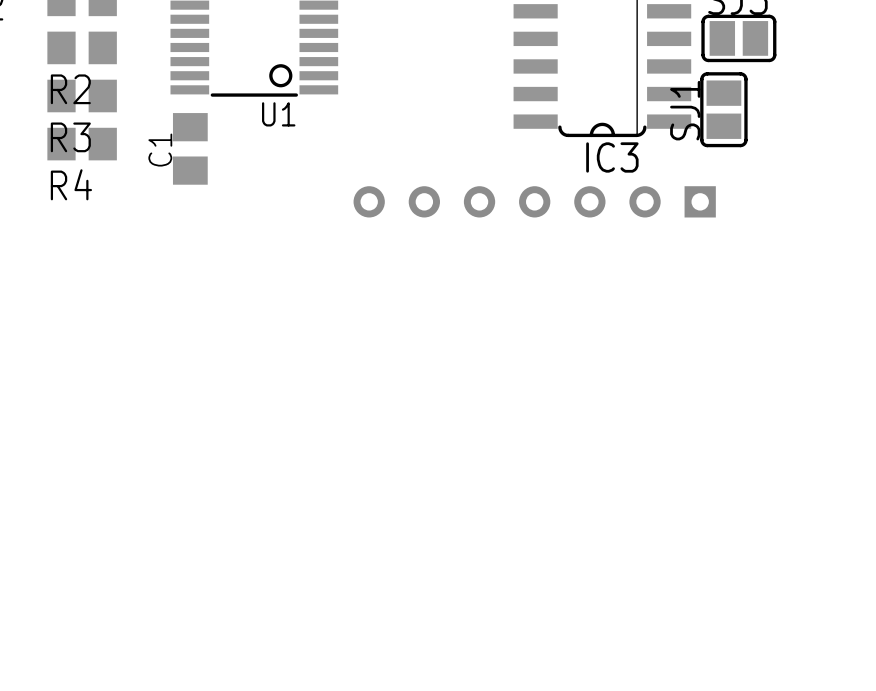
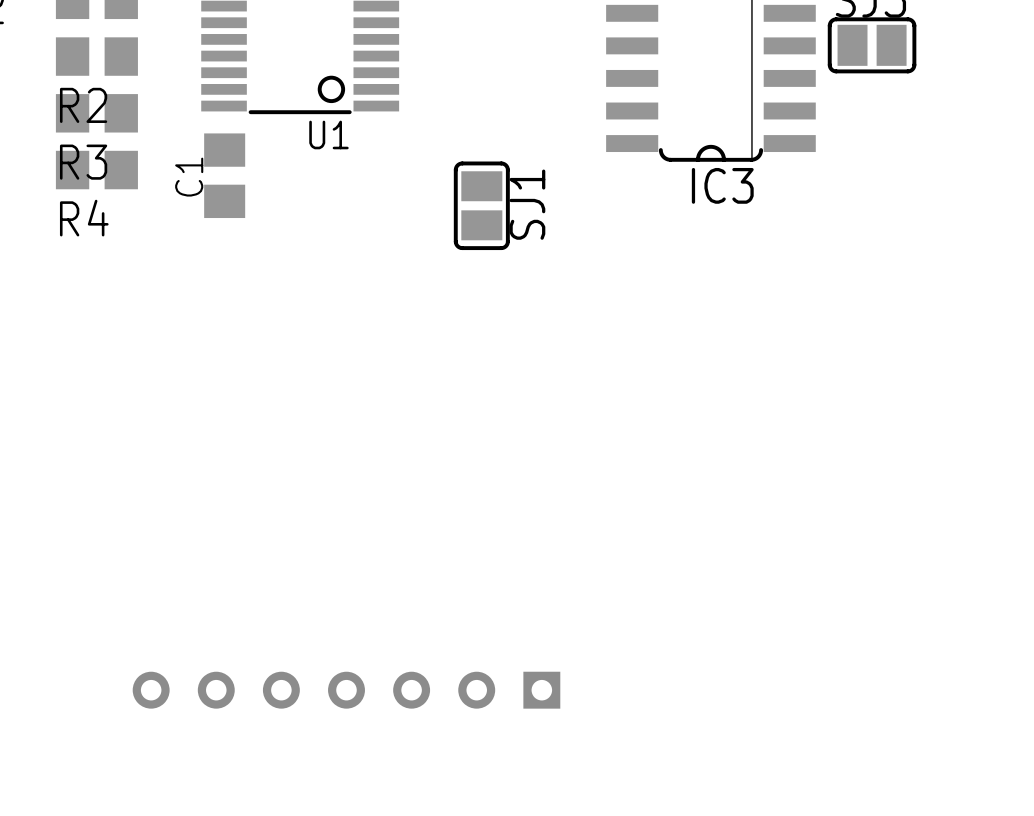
SJ1 position: (723, 109) -> (481, 205)
SJ1 name position: SJ1 (685, 110) -> SJ1 (527, 204)
part position: (534, 201) -> (346, 690)

